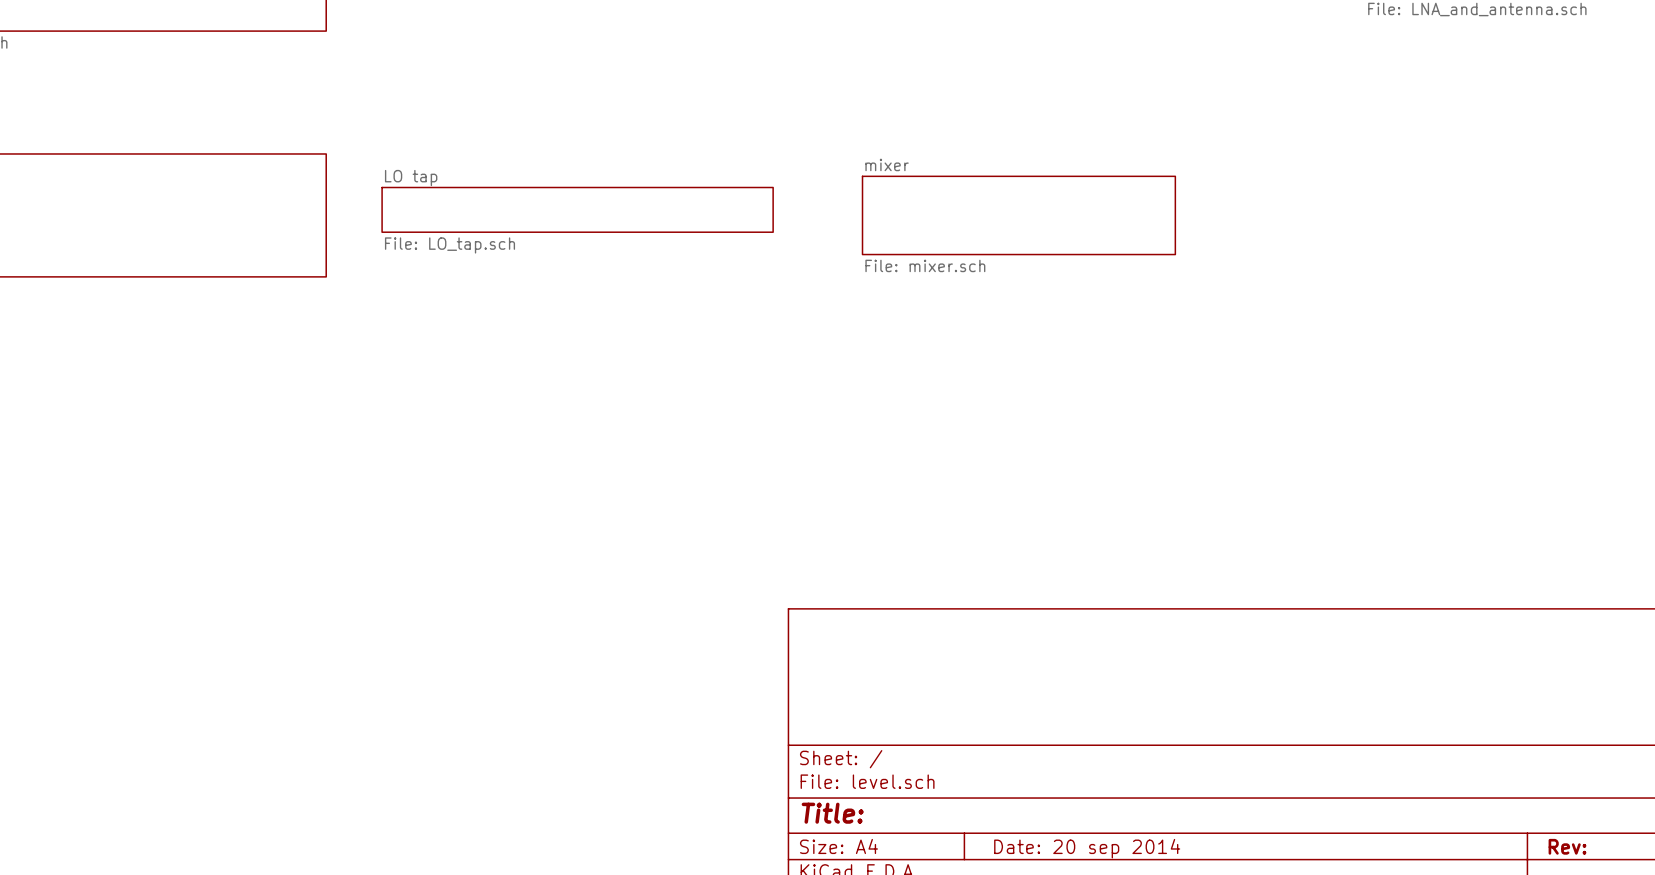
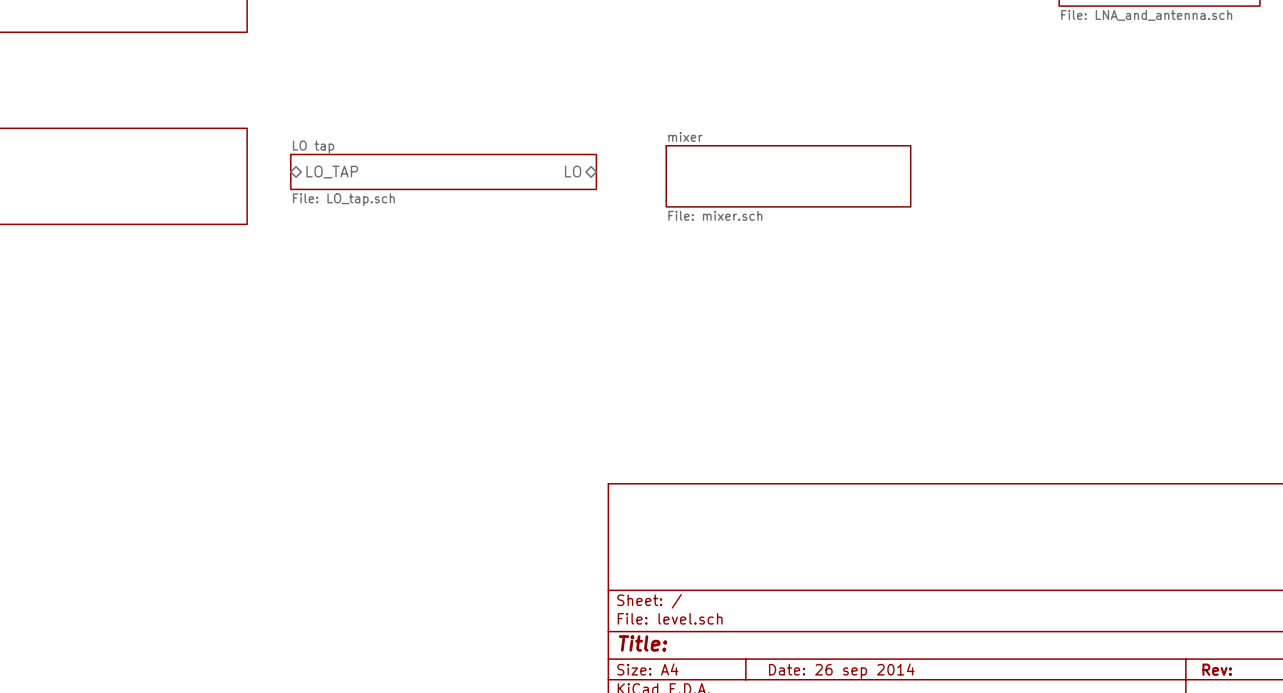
sheet pin: none -> LO_TAP (332, 172)
sheet pin: none -> LO (573, 171)
title block: Date: 20 sep 2014 (1087, 848) -> Date: 26 sep 2014 (841, 671)

